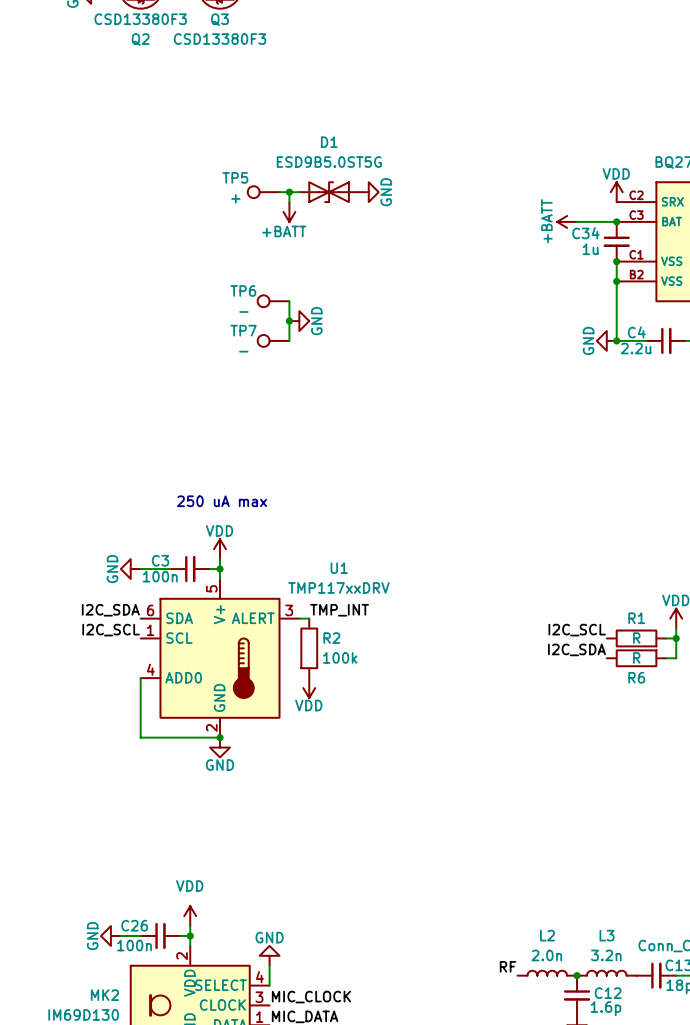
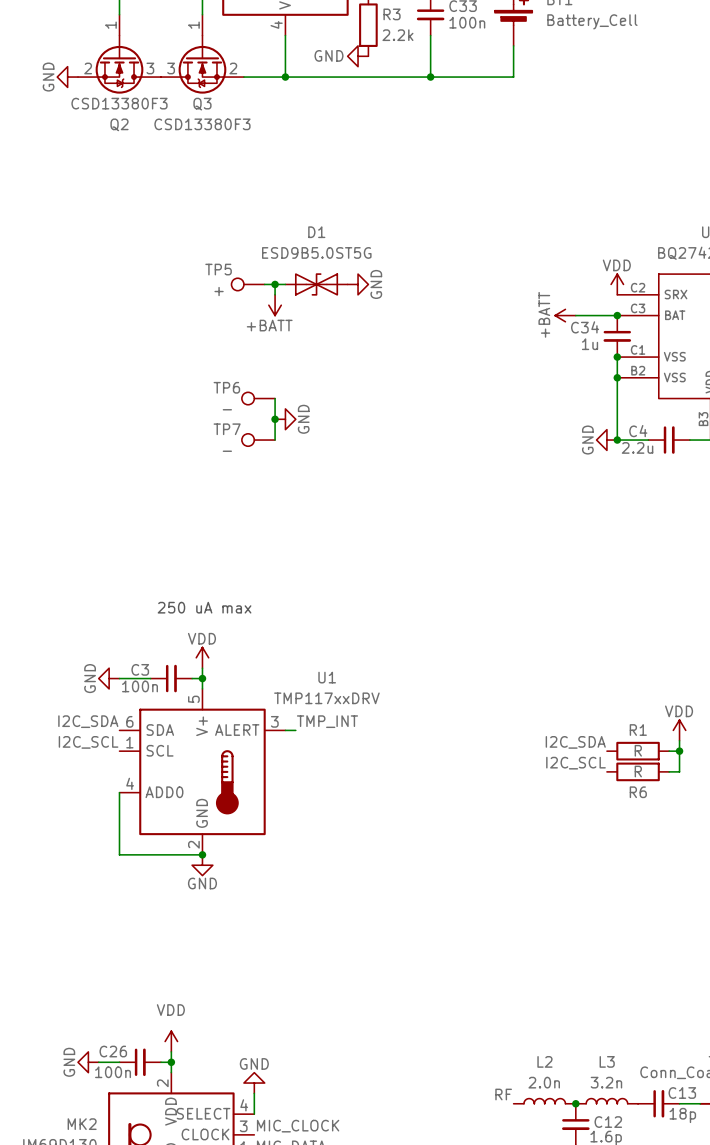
label: I2C_SCL (577, 630) -> I2C_SDA (575, 742)
R2: 100k (309, 648) -> none
label: I2C_SDA (576, 649) -> I2C_SCL (575, 763)
power symbol: VDD (309, 688) -> none

